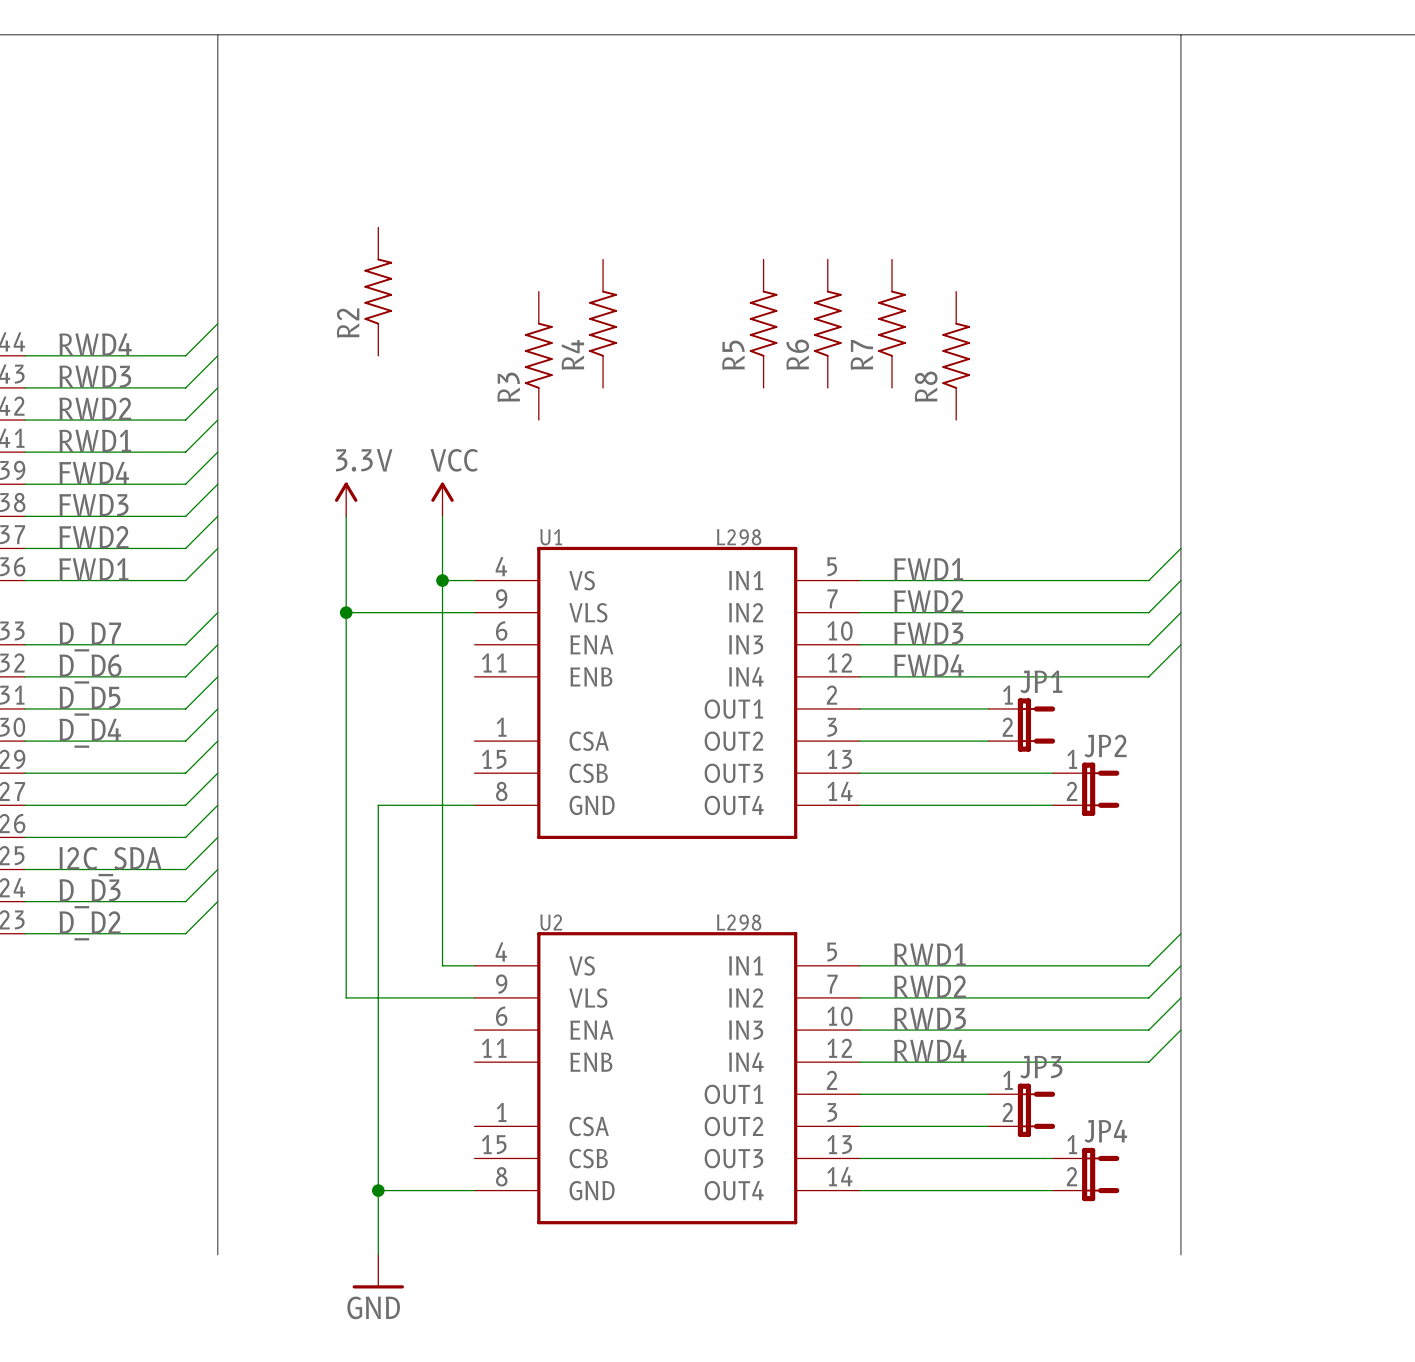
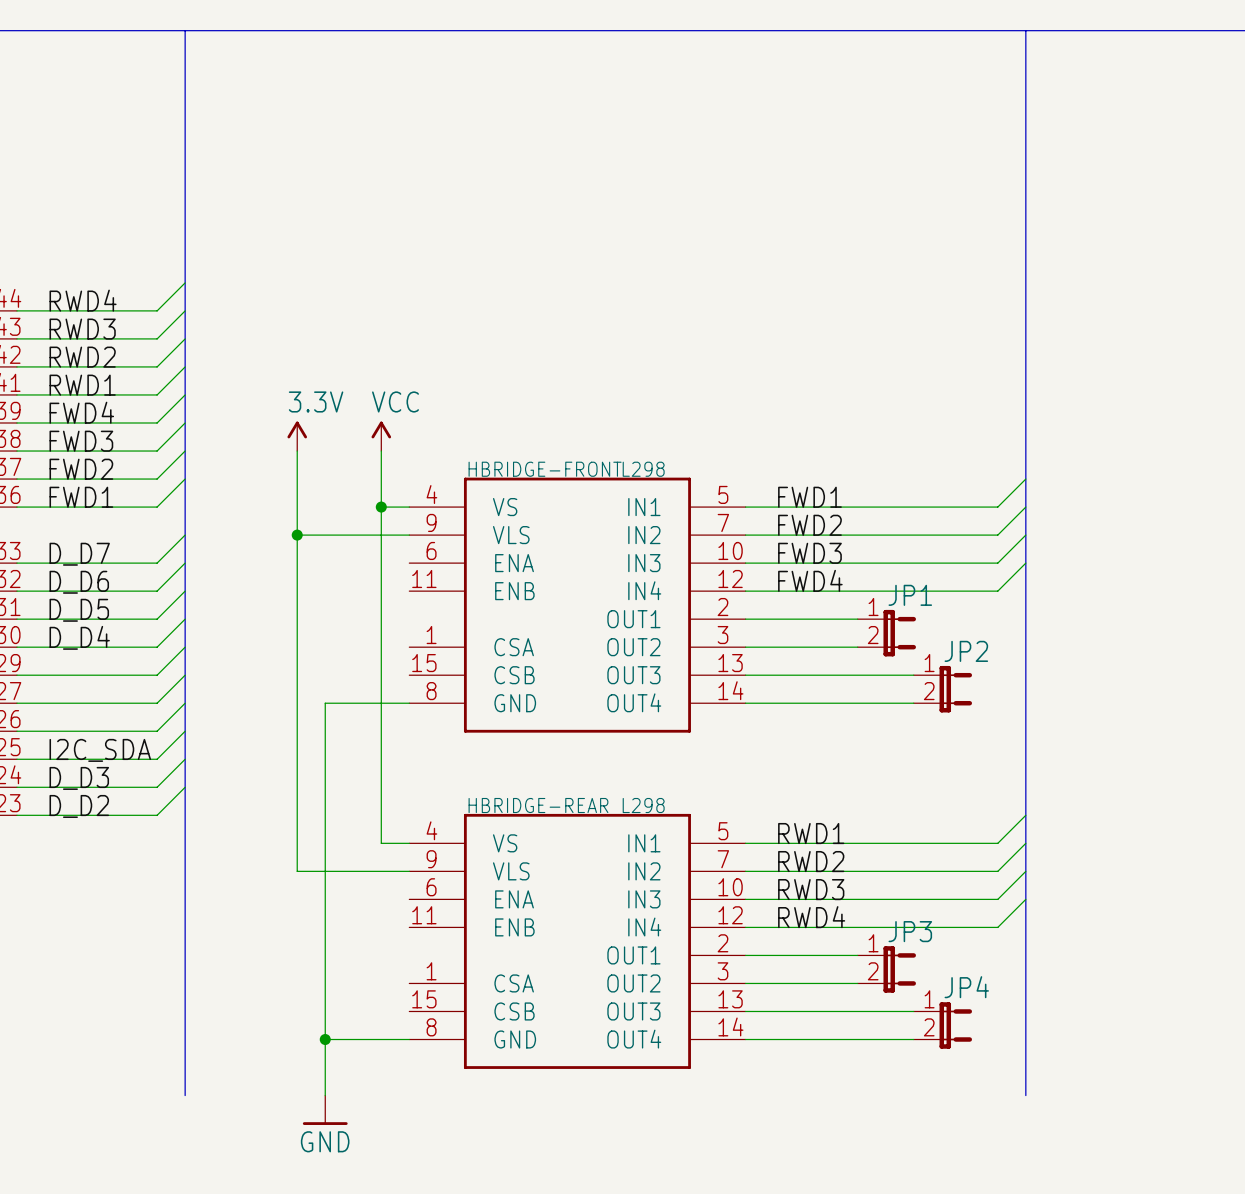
R2: (378, 291) -> none
R4: (603, 323) -> none
R5: (763, 323) -> none
R6: (827, 323) -> none
R7: (891, 323) -> none
R3: (538, 355) -> none
R8: (956, 355) -> none
U1 name: U1 (551, 537) -> HBRIDGE-FRONT (545, 469)
U2 name: U2 (551, 922) -> HBRIDGE-REAR (538, 805)

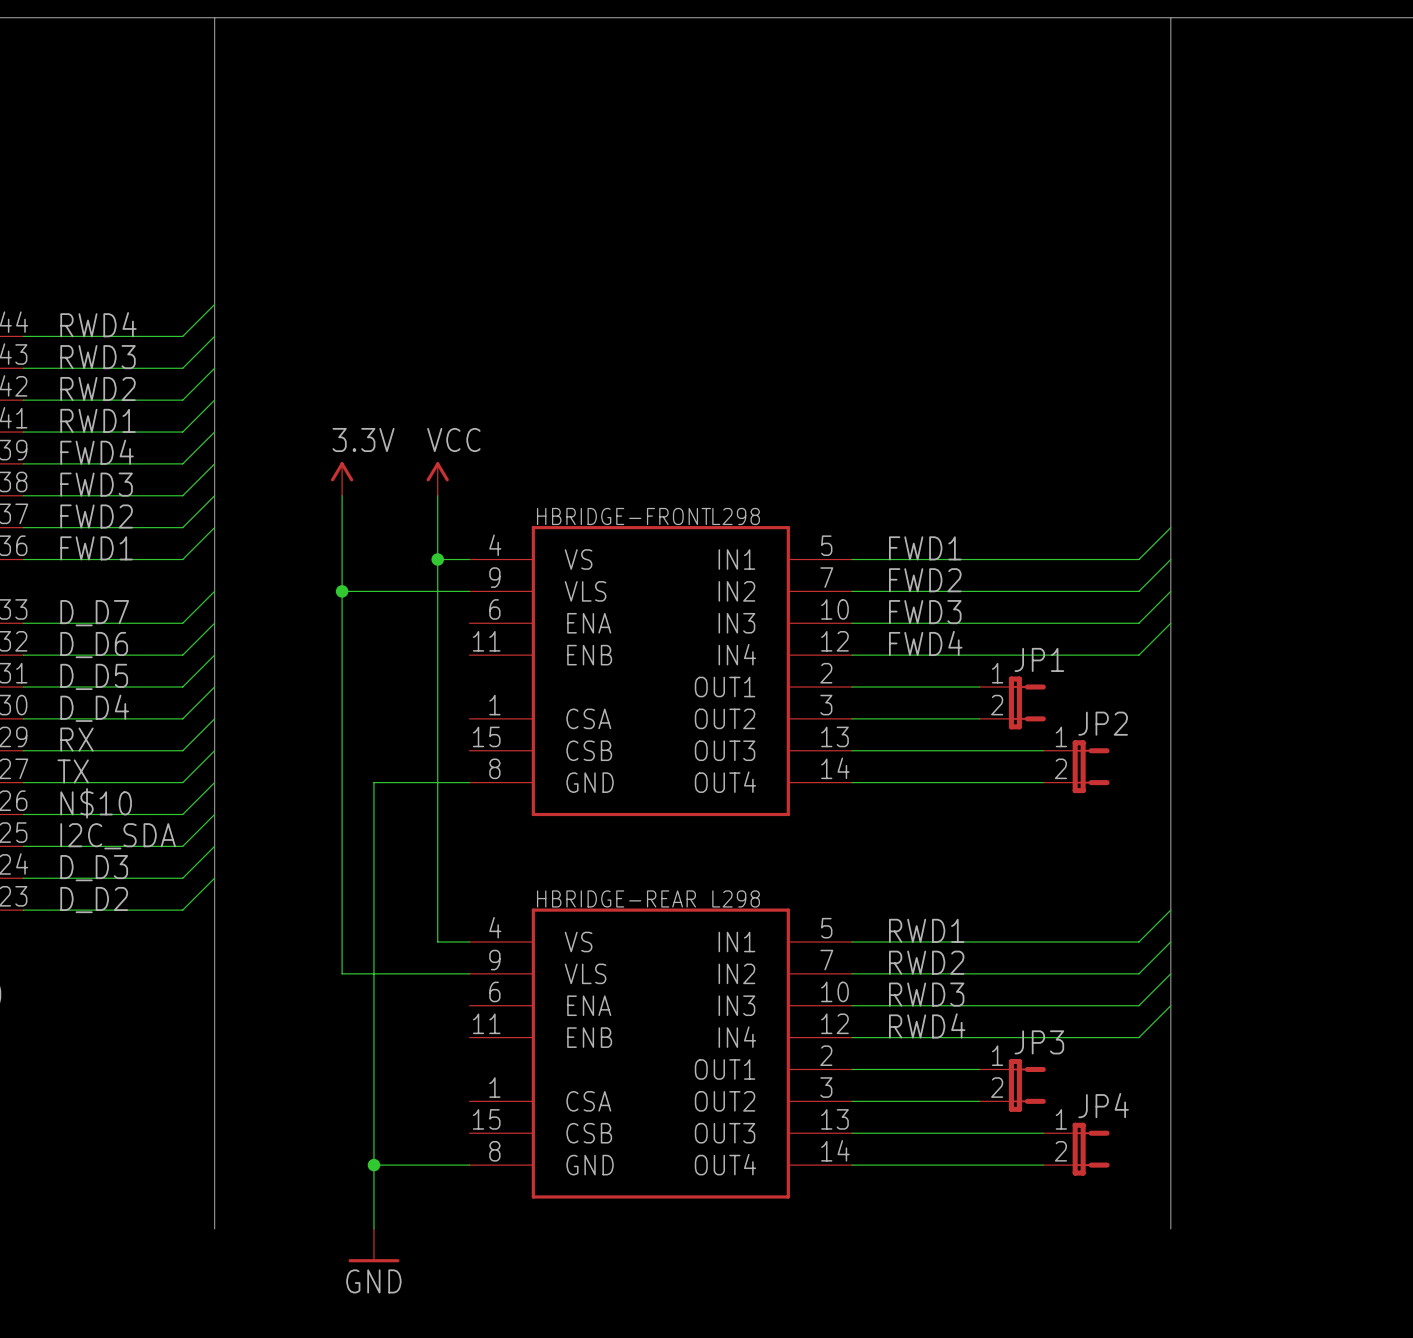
label: none -> RX (76, 739)
label: none -> TX (73, 771)
label: none -> N$10 (96, 803)

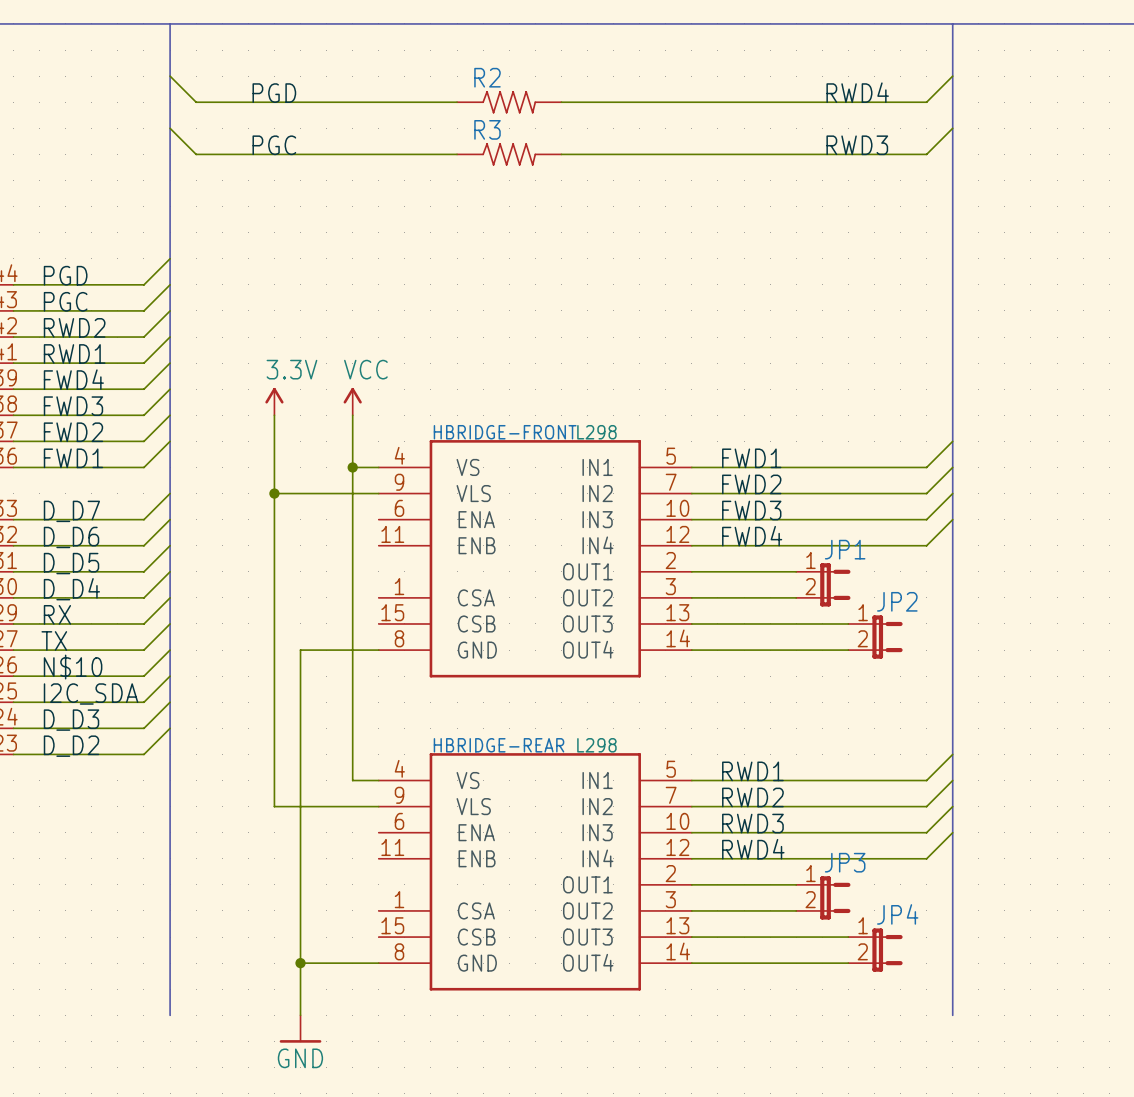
wire: none -> (170, 76) (196, 102) (457, 102)
wire: none -> (952, 76) (926, 102) (561, 102)
label: none -> RWD4 (857, 92)
label: none -> PGD (274, 93)
R2: none -> (509, 102)
wire: none -> (170, 128) (196, 154) (457, 154)
wire: none -> (952, 128) (926, 154) (561, 154)
label: none -> PGC (274, 145)
label: none -> RWD3 (857, 145)
R3: none -> (509, 154)
label: RWD4 (98, 324) -> PGD (65, 275)
label: RWD3 (98, 357) -> PGC (65, 301)

